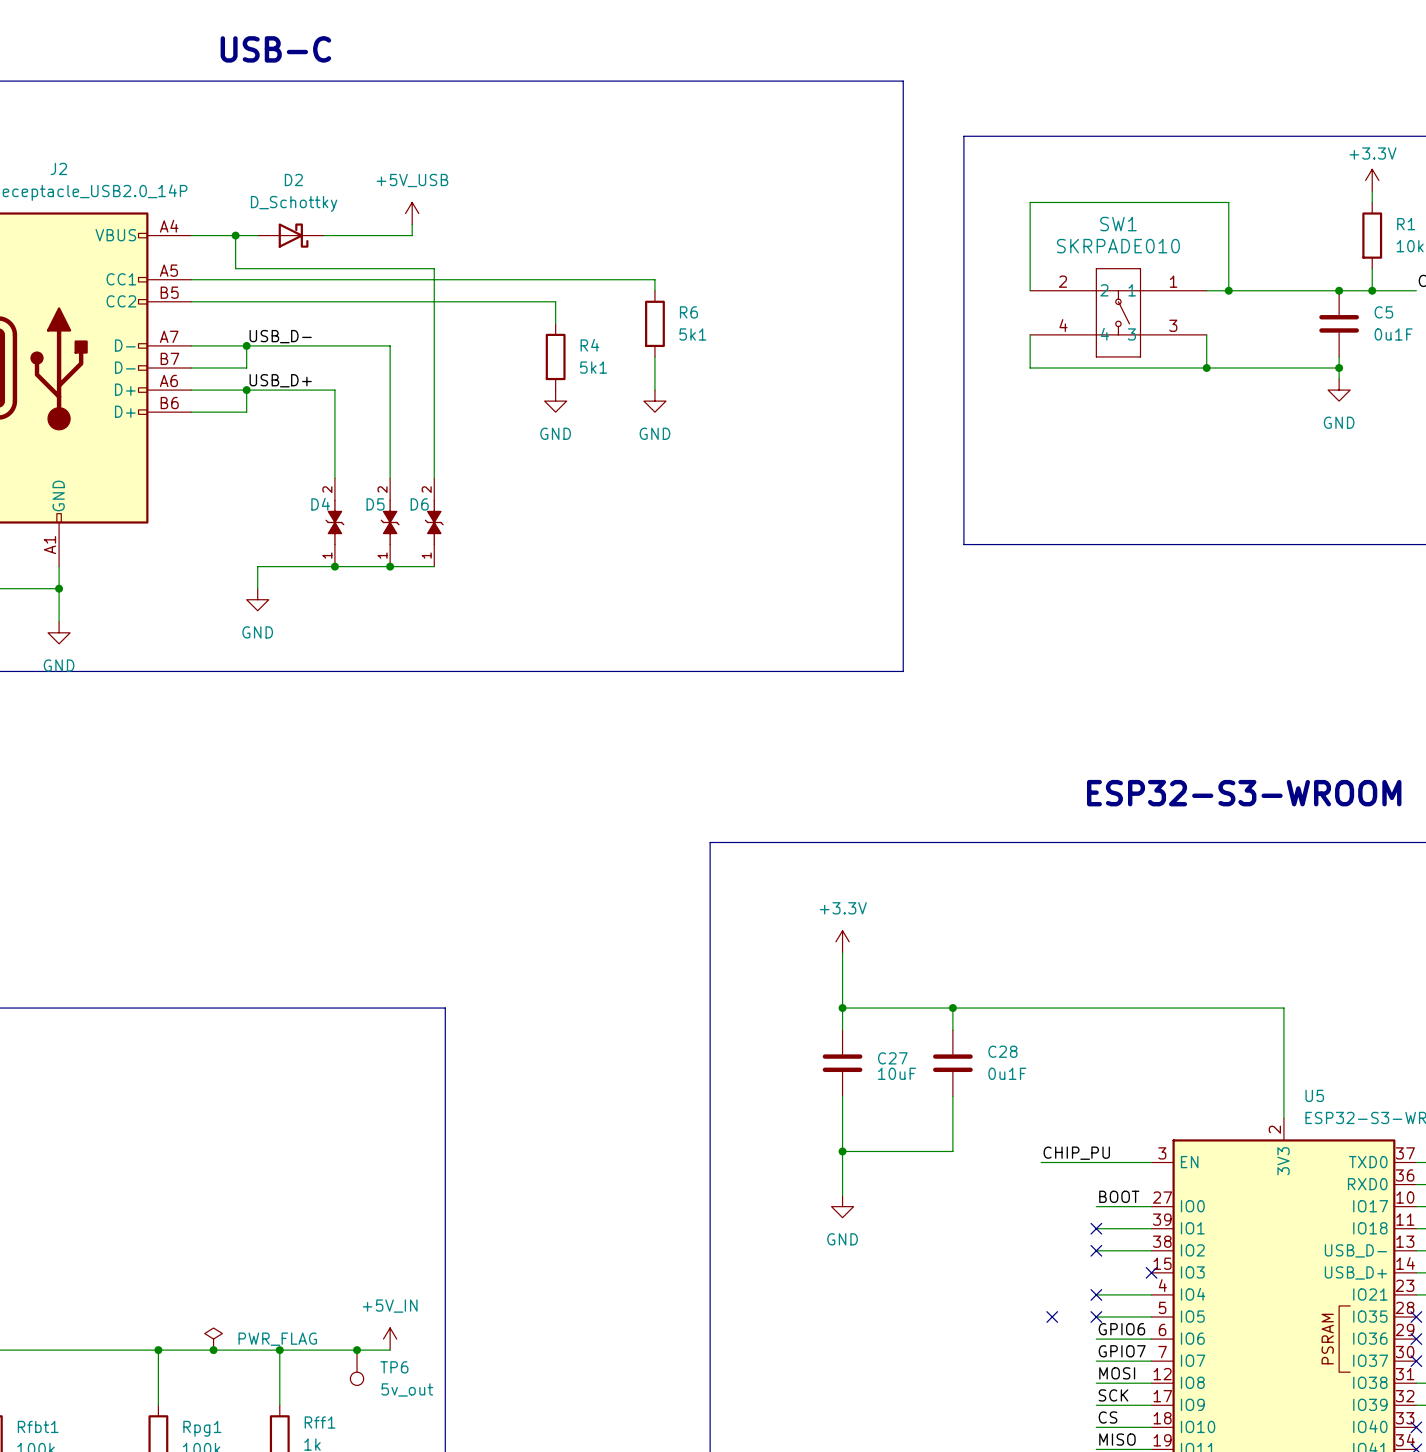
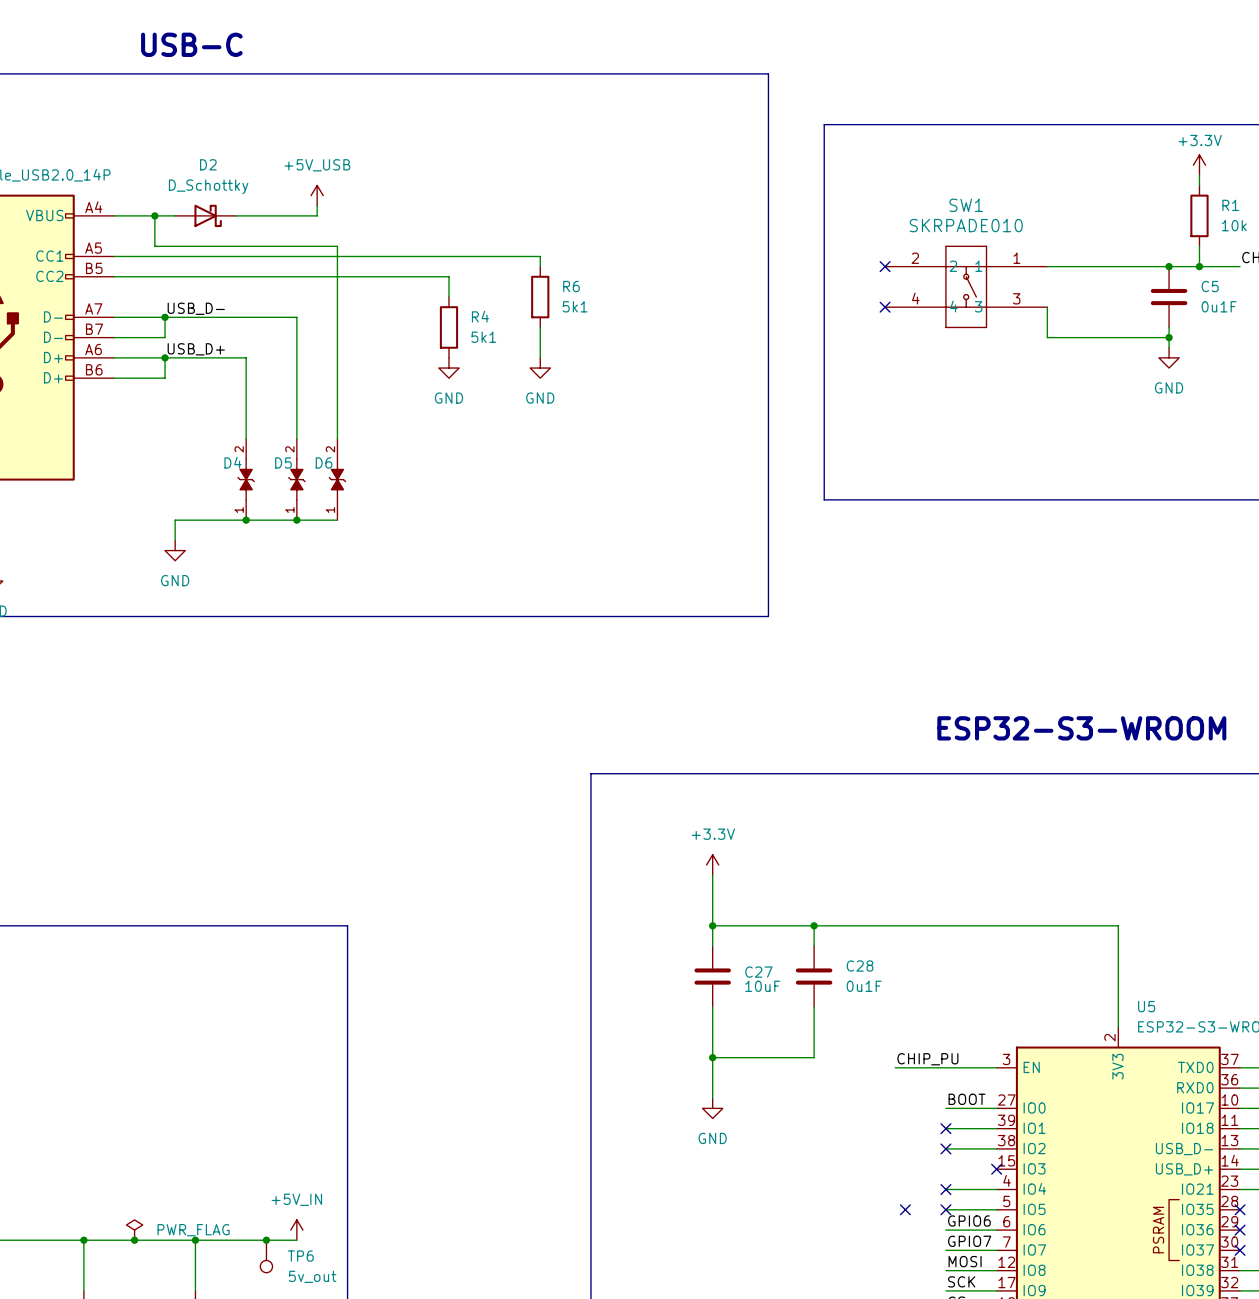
wire: (1030, 290) (1030, 202) (1228, 202) (1228, 290) -> none
no-connect mark: none -> (885, 266)
junction: (1228, 290) -> none
wire: (1030, 334) (1030, 368) (1206, 368) -> none
no-connect mark: none -> (885, 307)
junction: (1206, 368) -> none

